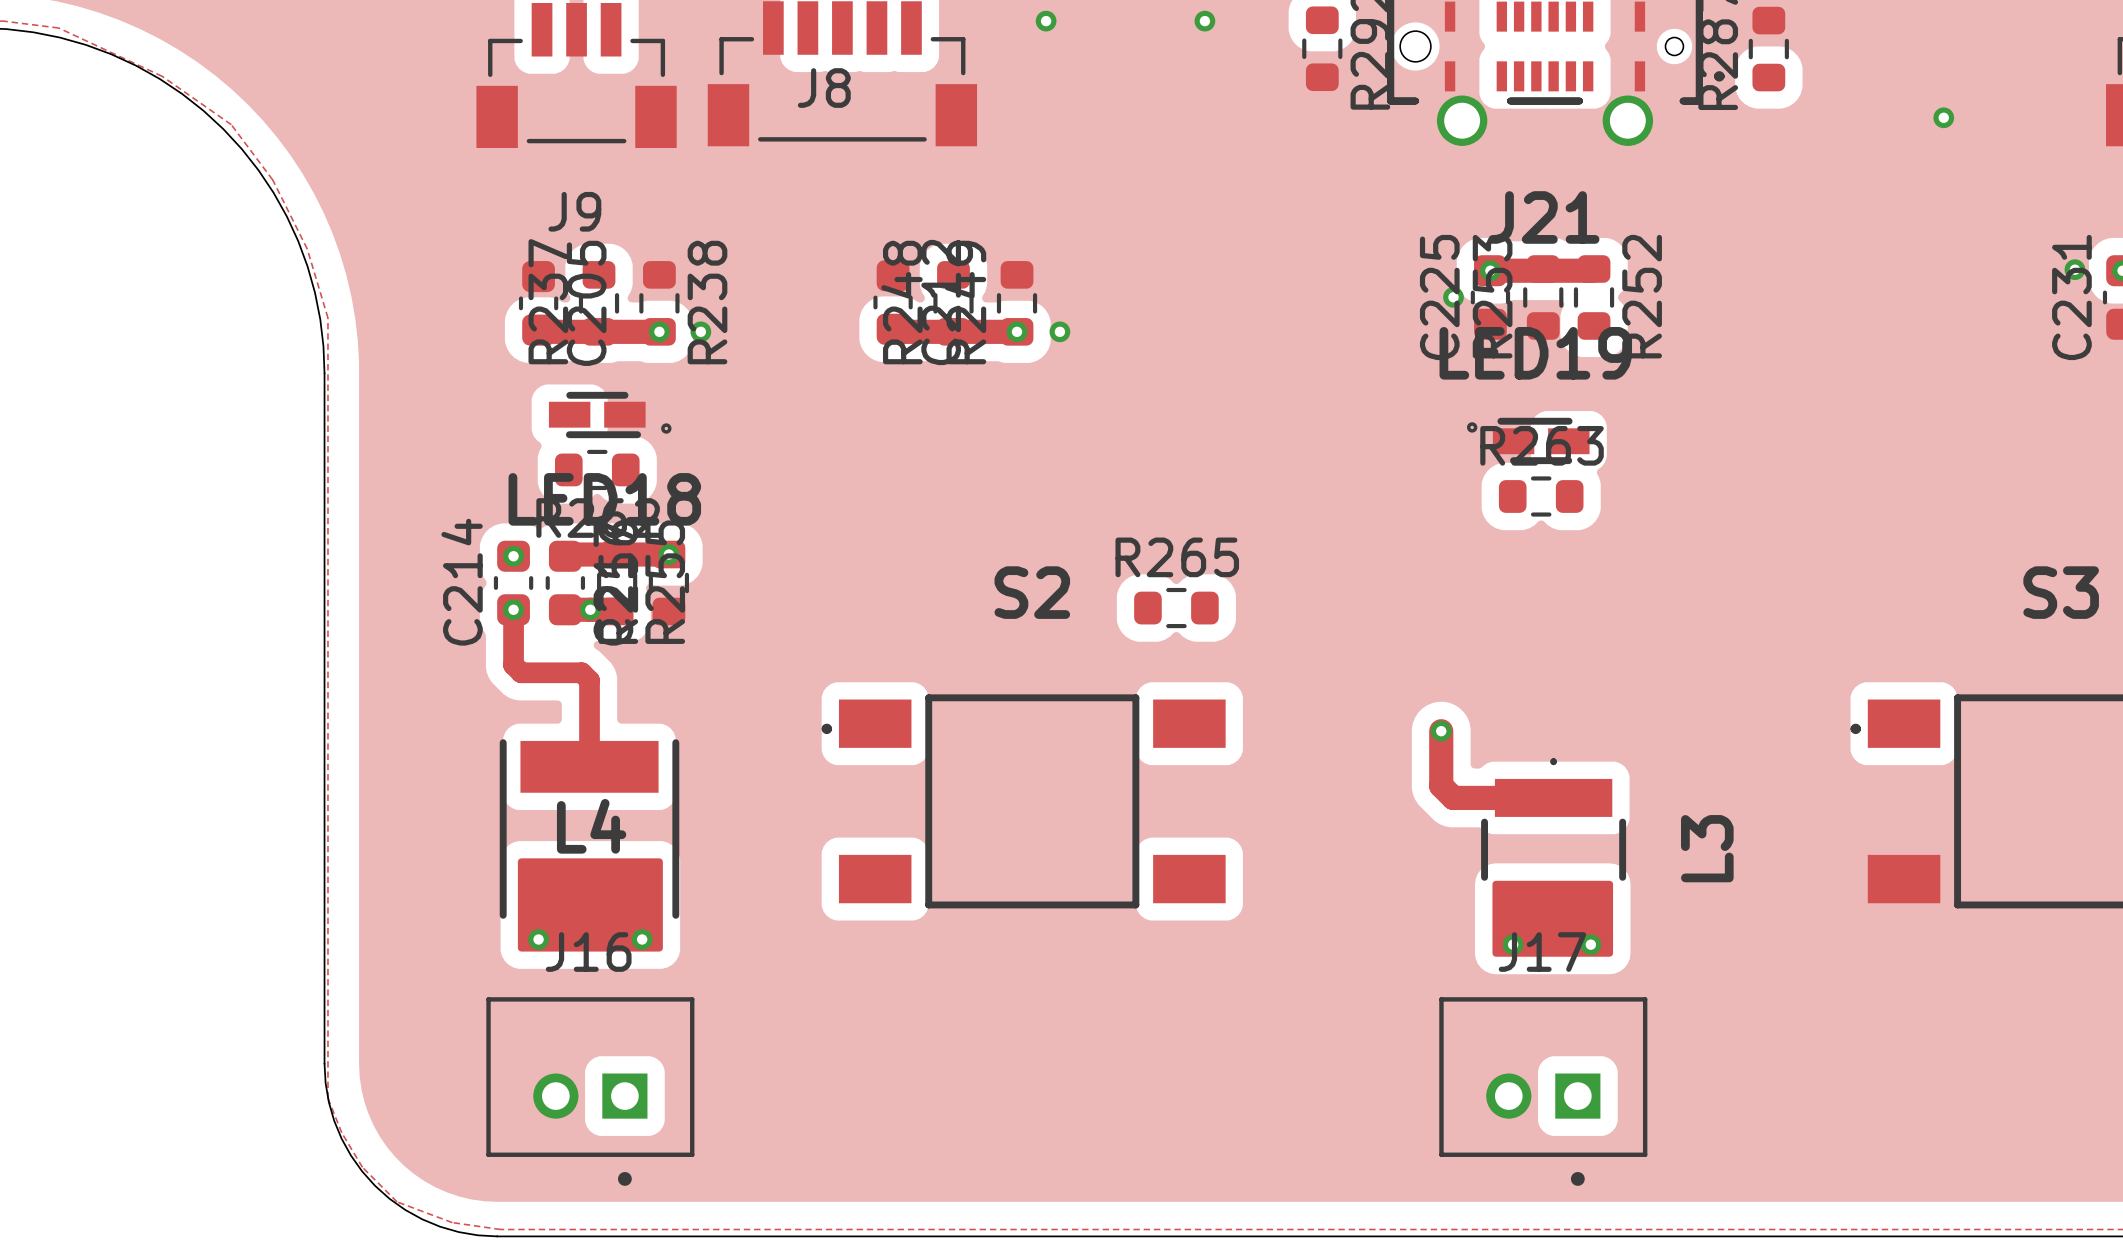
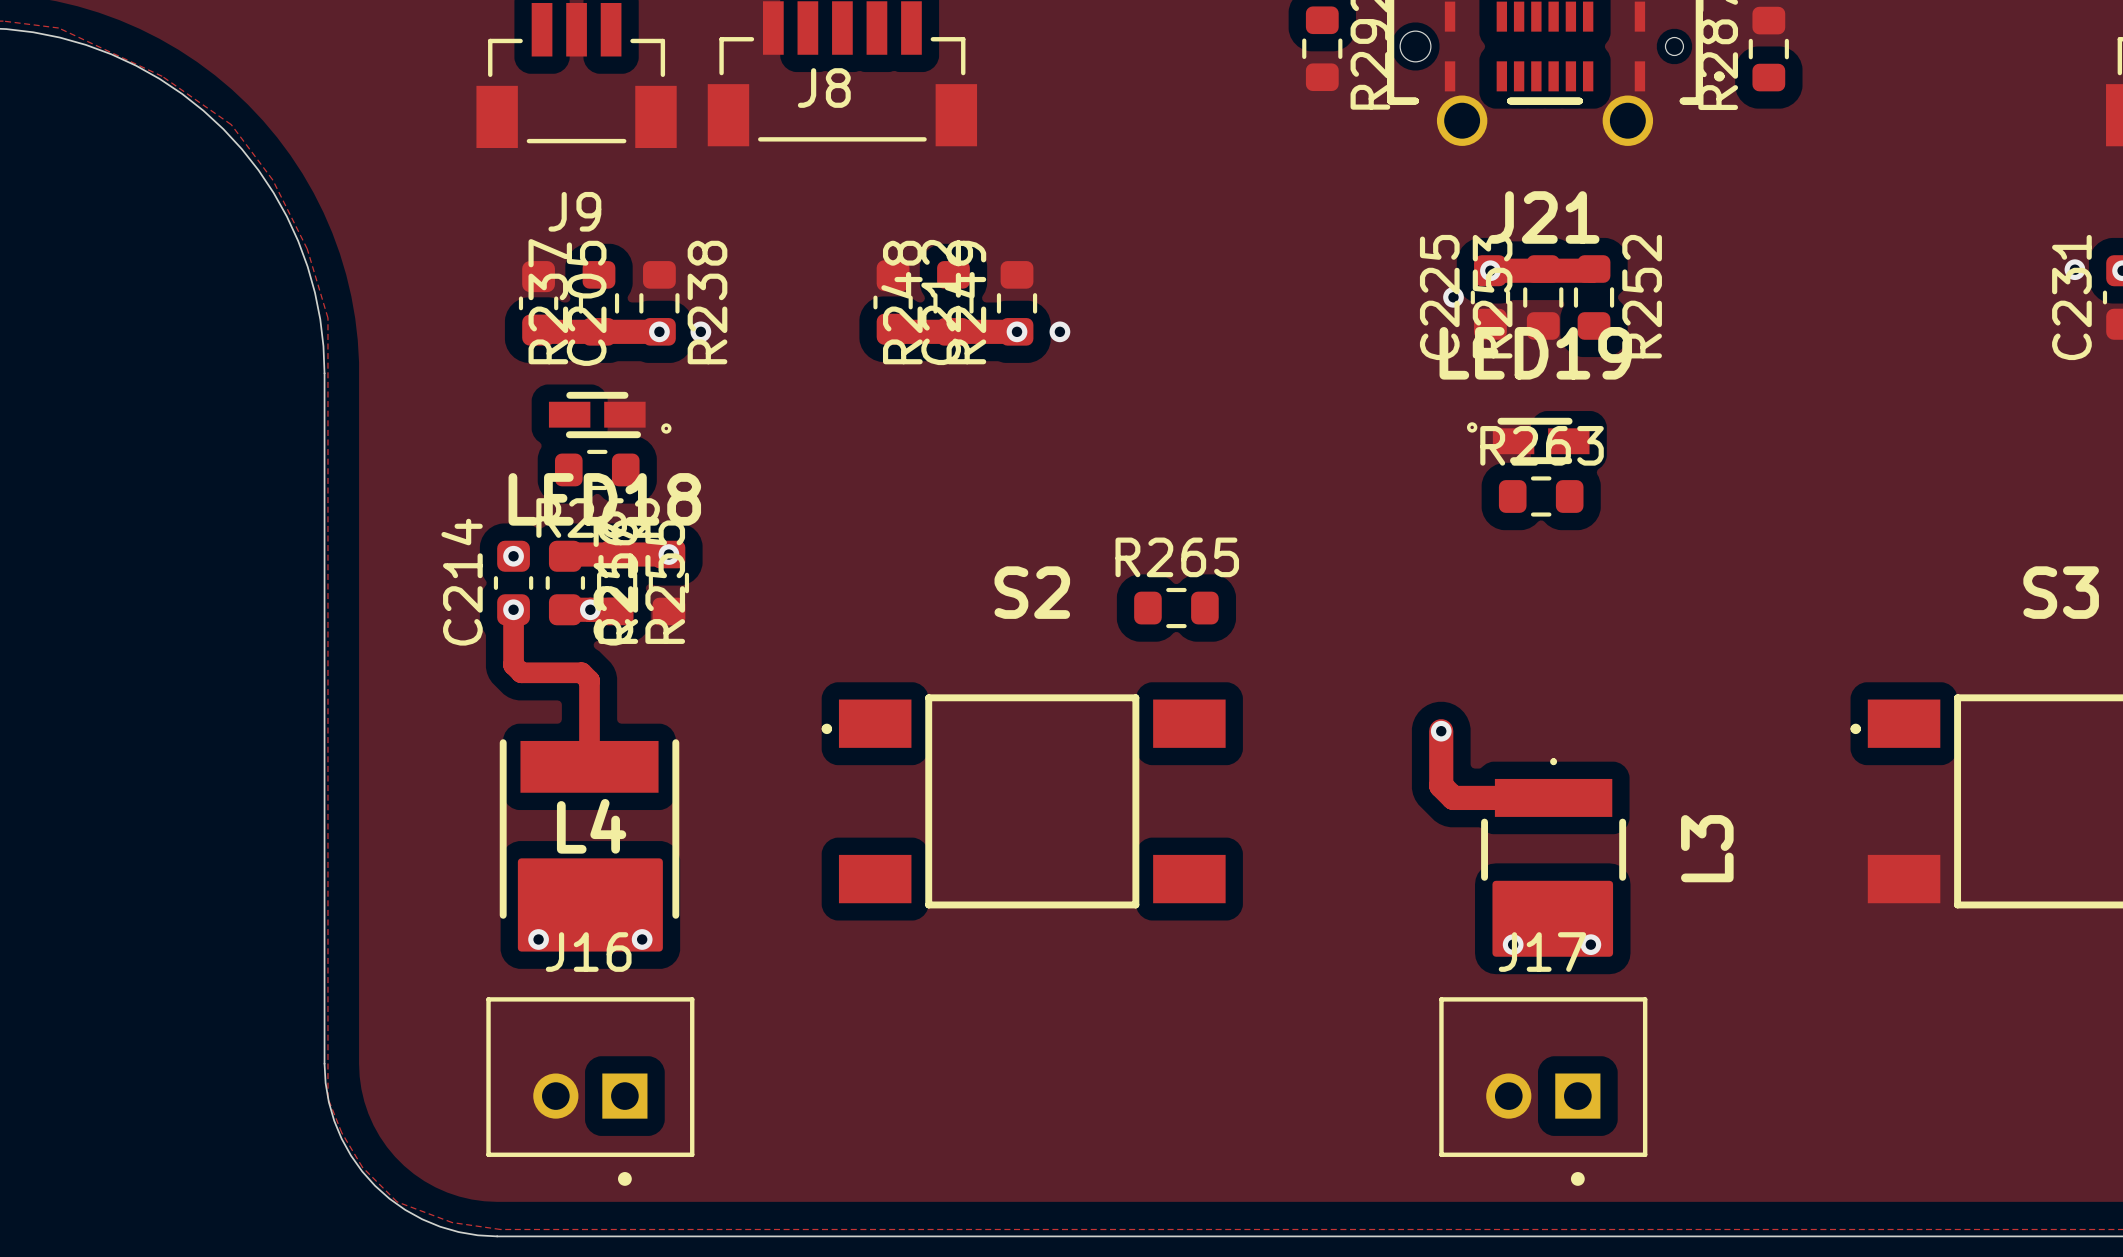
via: (1046, 21) -> none
via: (1204, 21) -> none
via: (1943, 117) -> none

